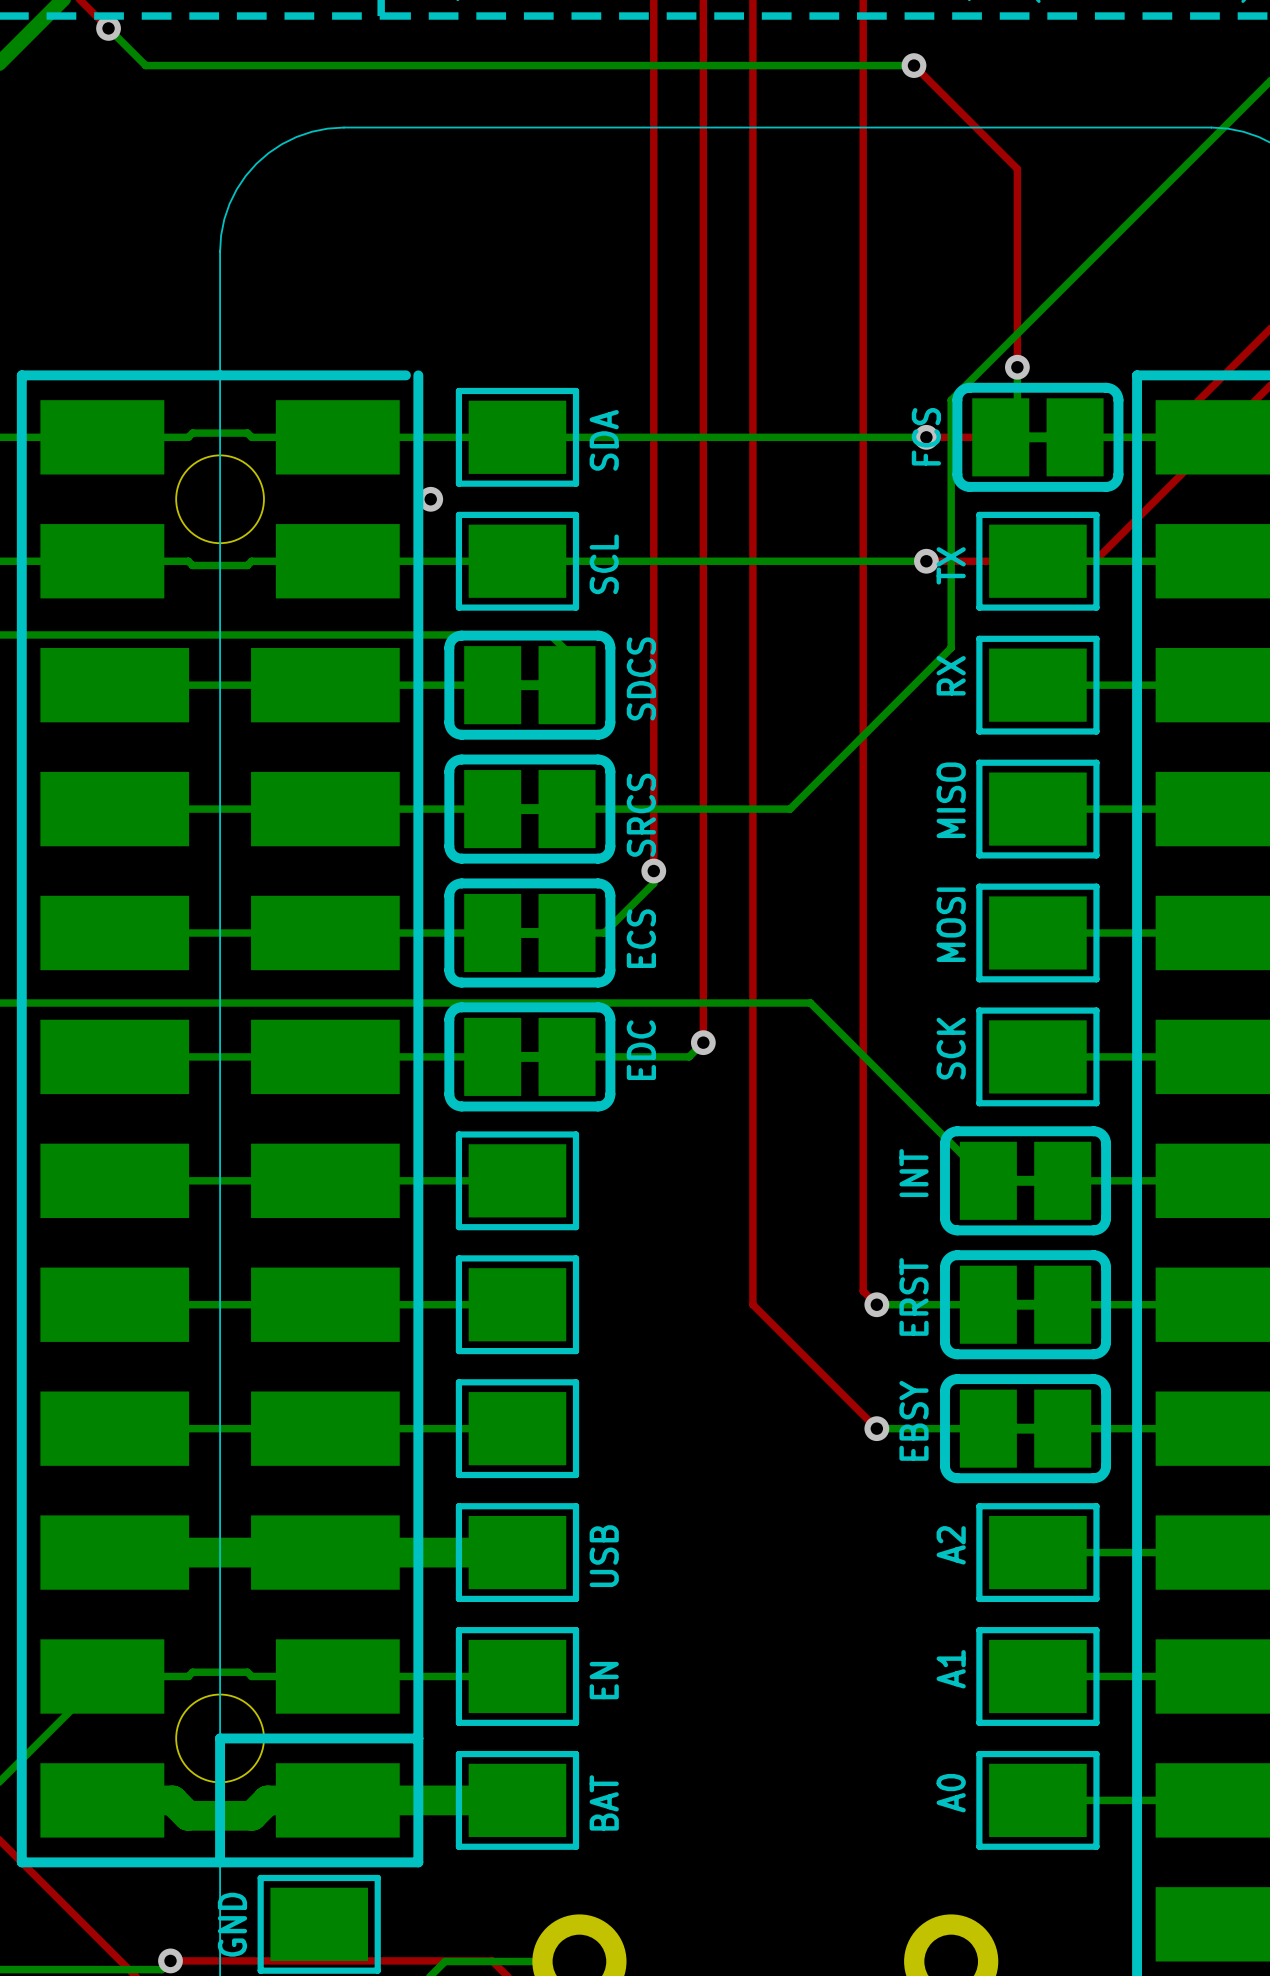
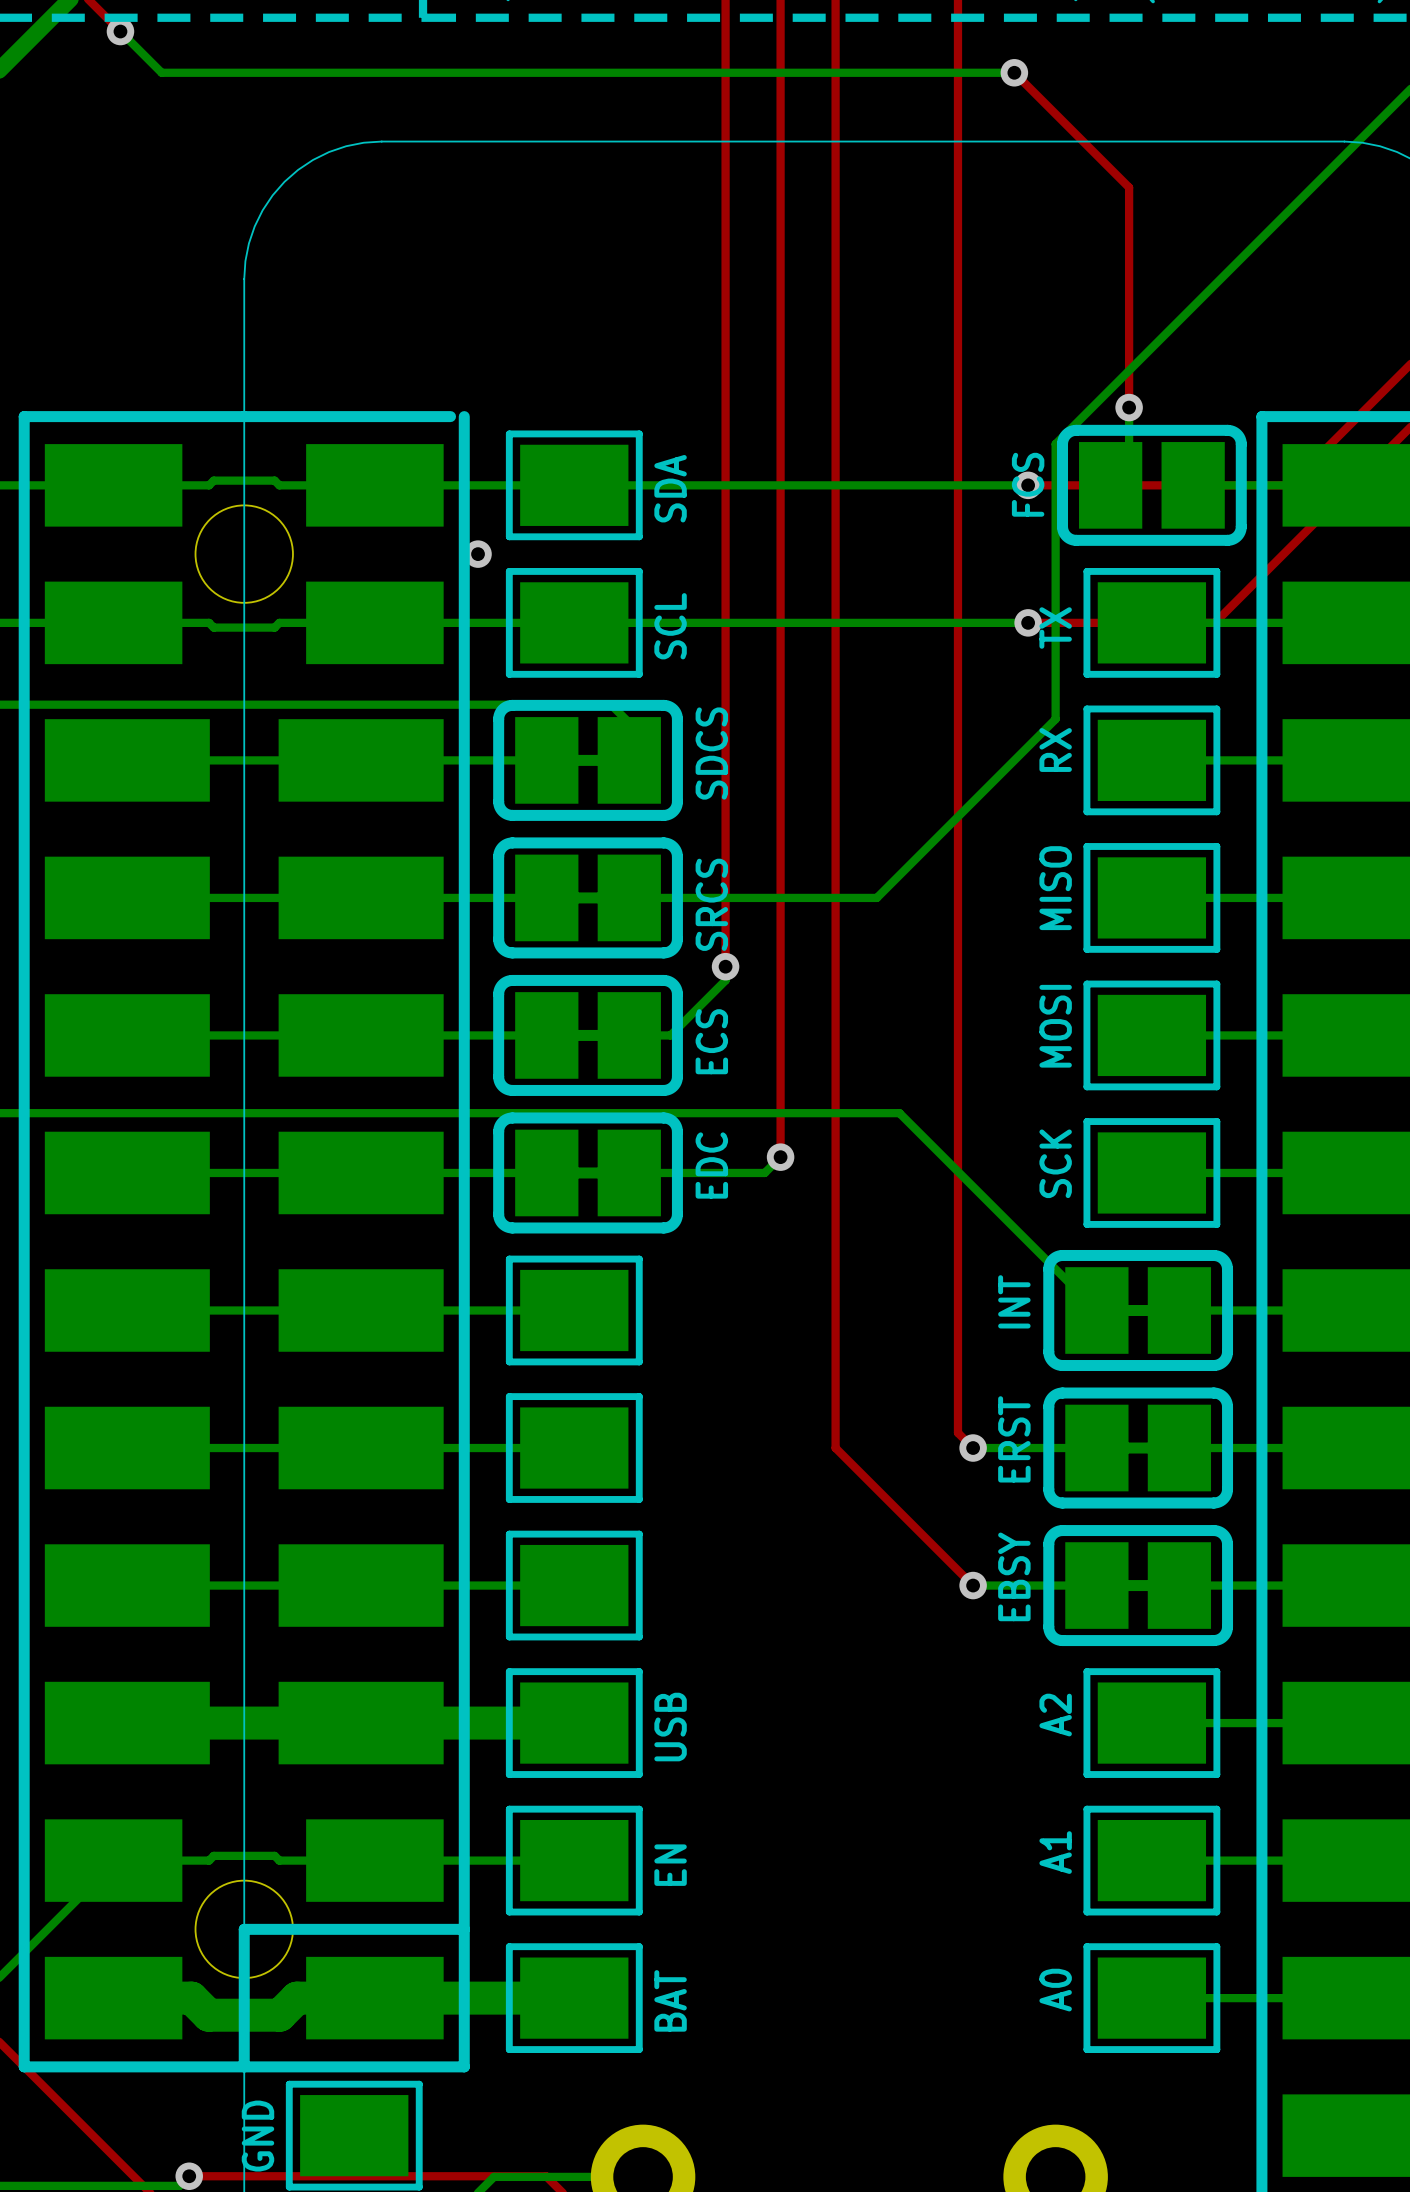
FCS footprint: [952, 382, 1124, 492] -> [1057, 424, 1247, 546]

